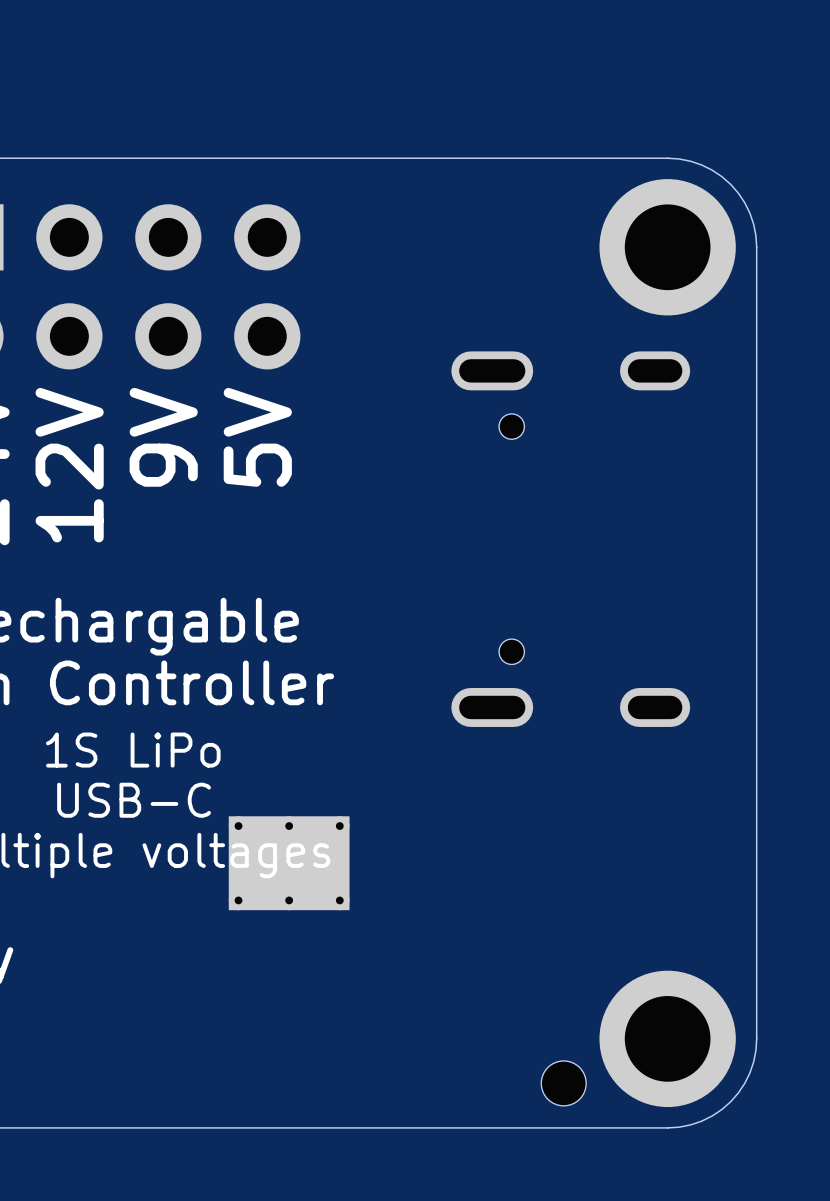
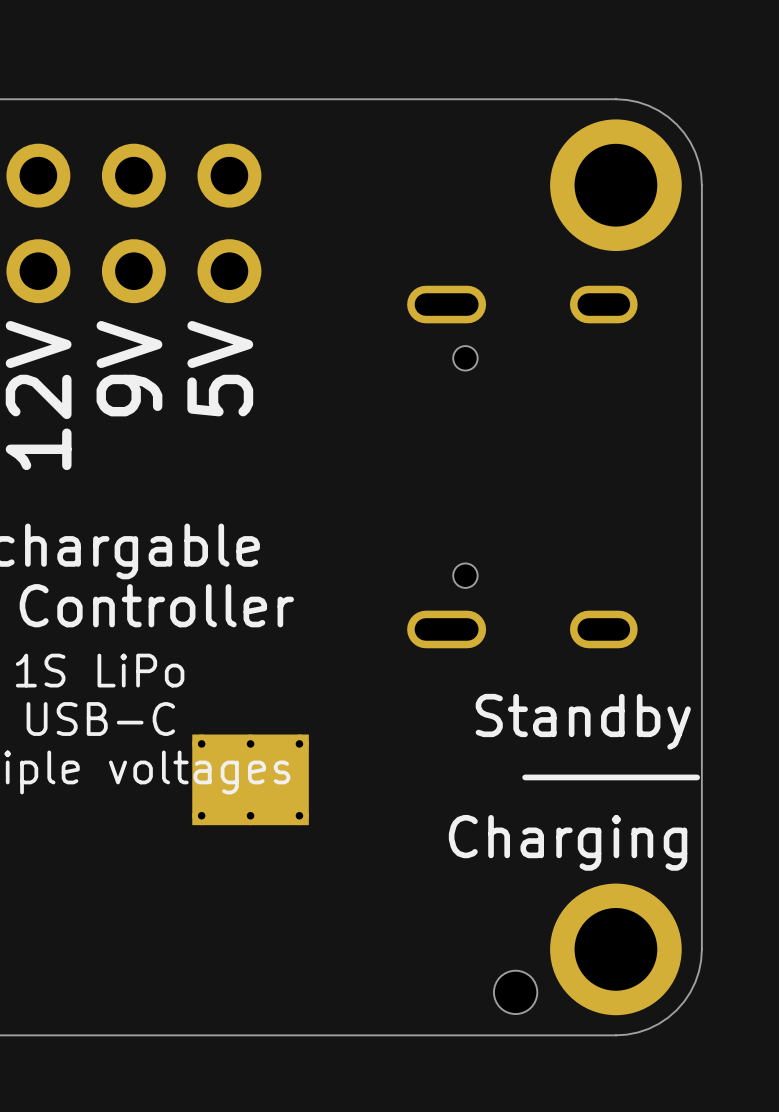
text: none -> Standby (583, 721)
line: none -> (697, 777) (525, 777)
text: none -> Charging (568, 842)

